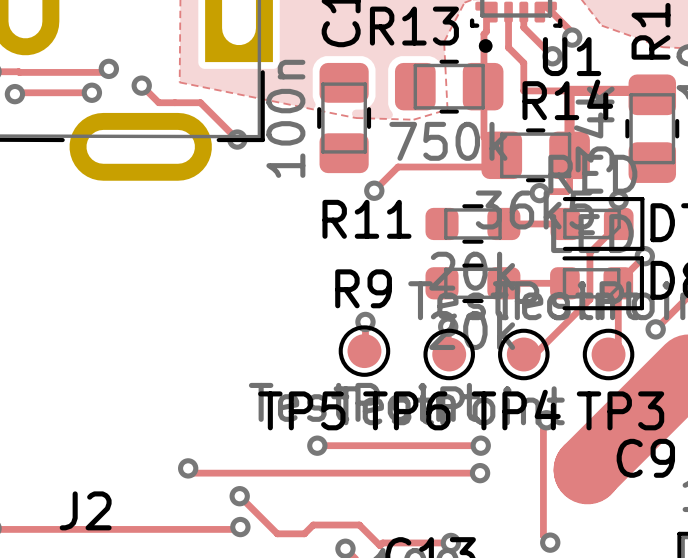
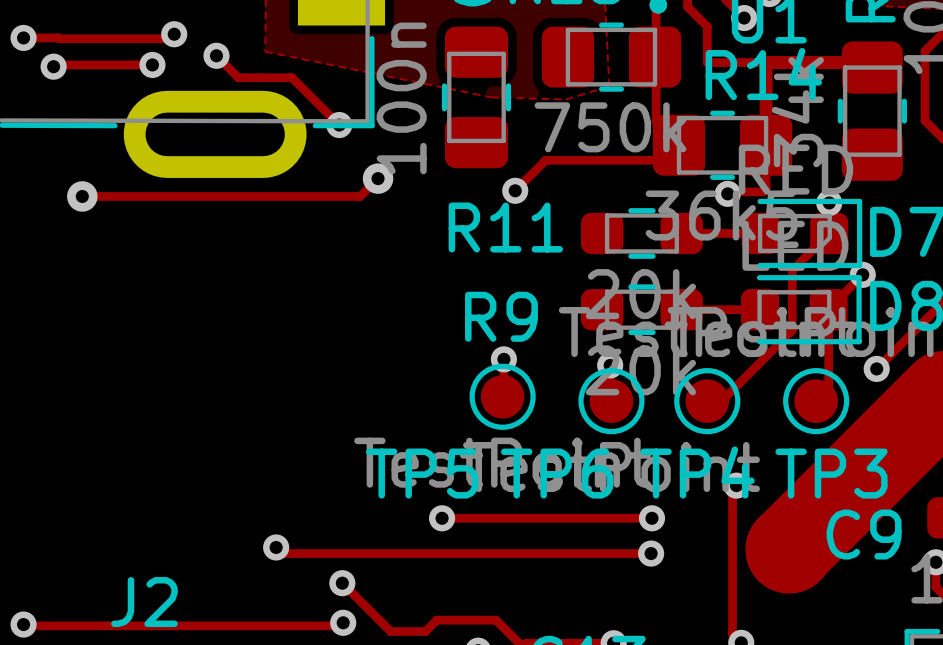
track: none -> (378, 178) (360, 196) (82, 196)
via: none -> (378, 178)
via: none -> (82, 196)

